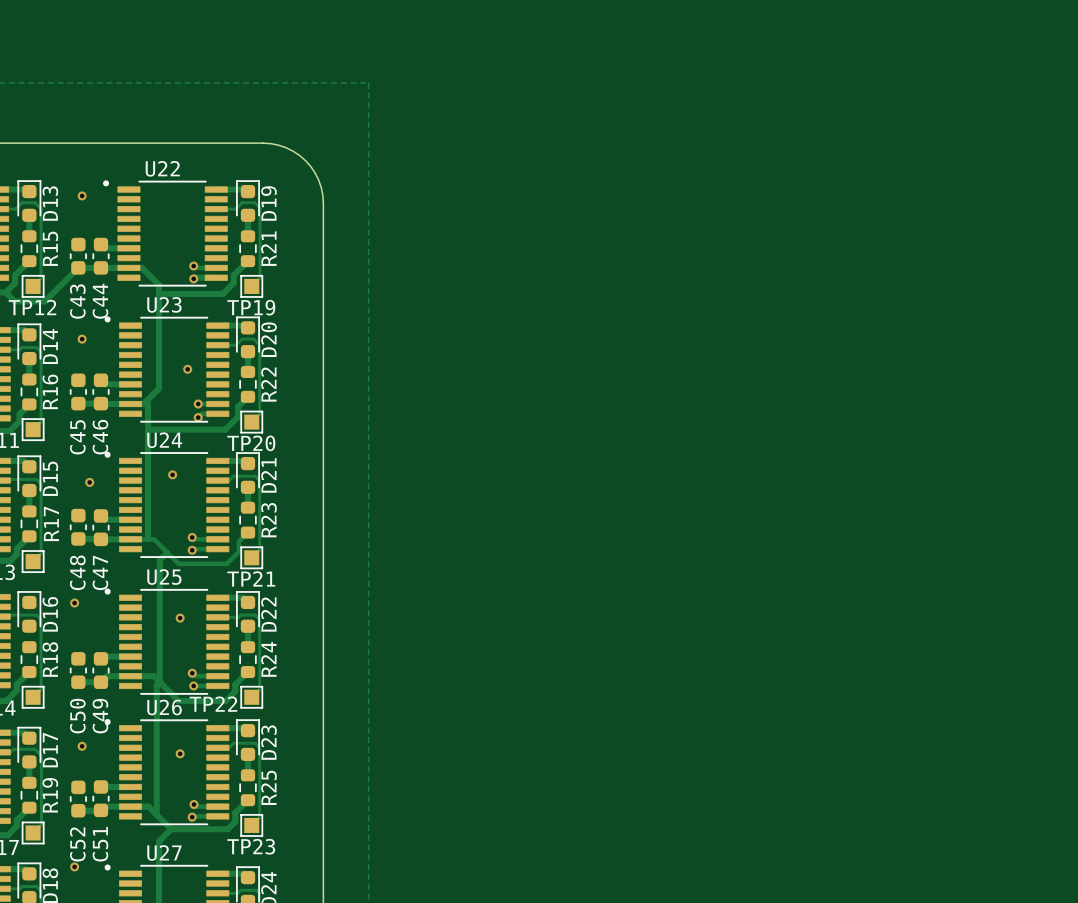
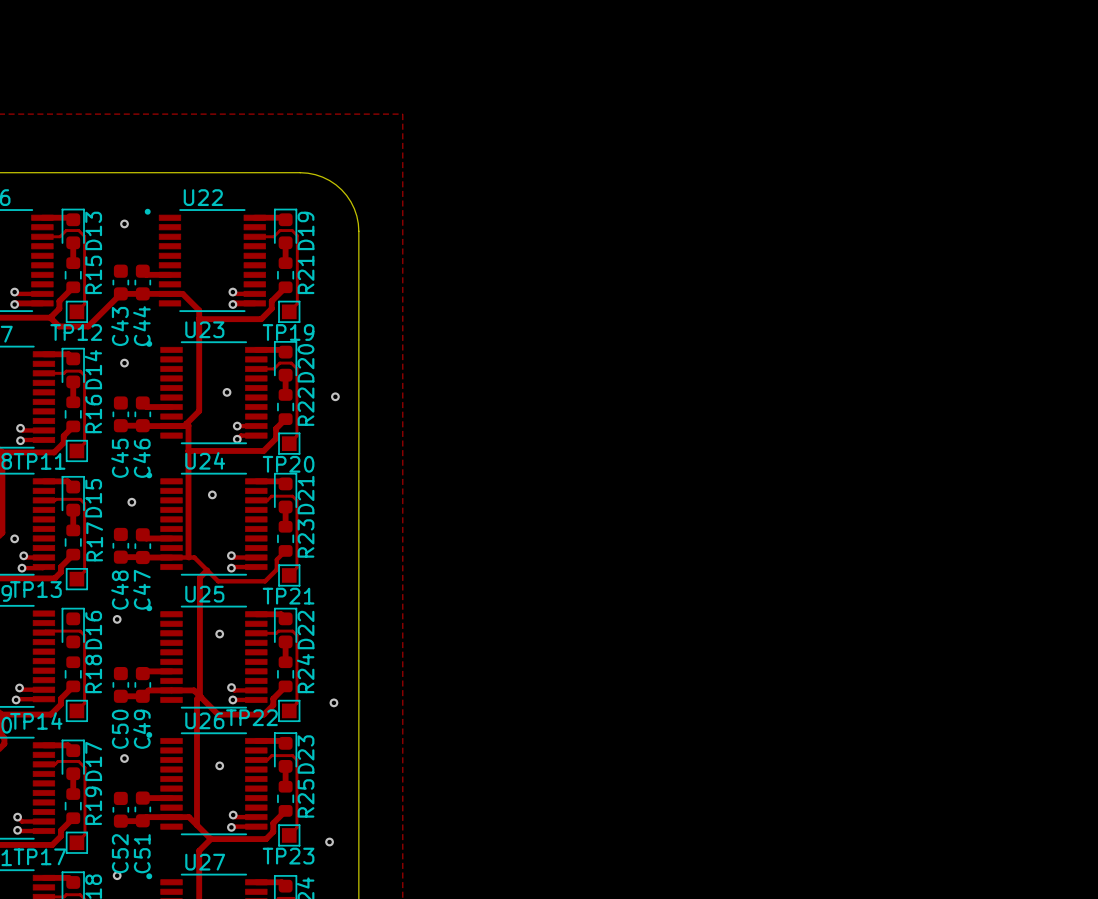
via: none -> (335, 396)
via: none -> (333, 702)
via: none -> (329, 842)

